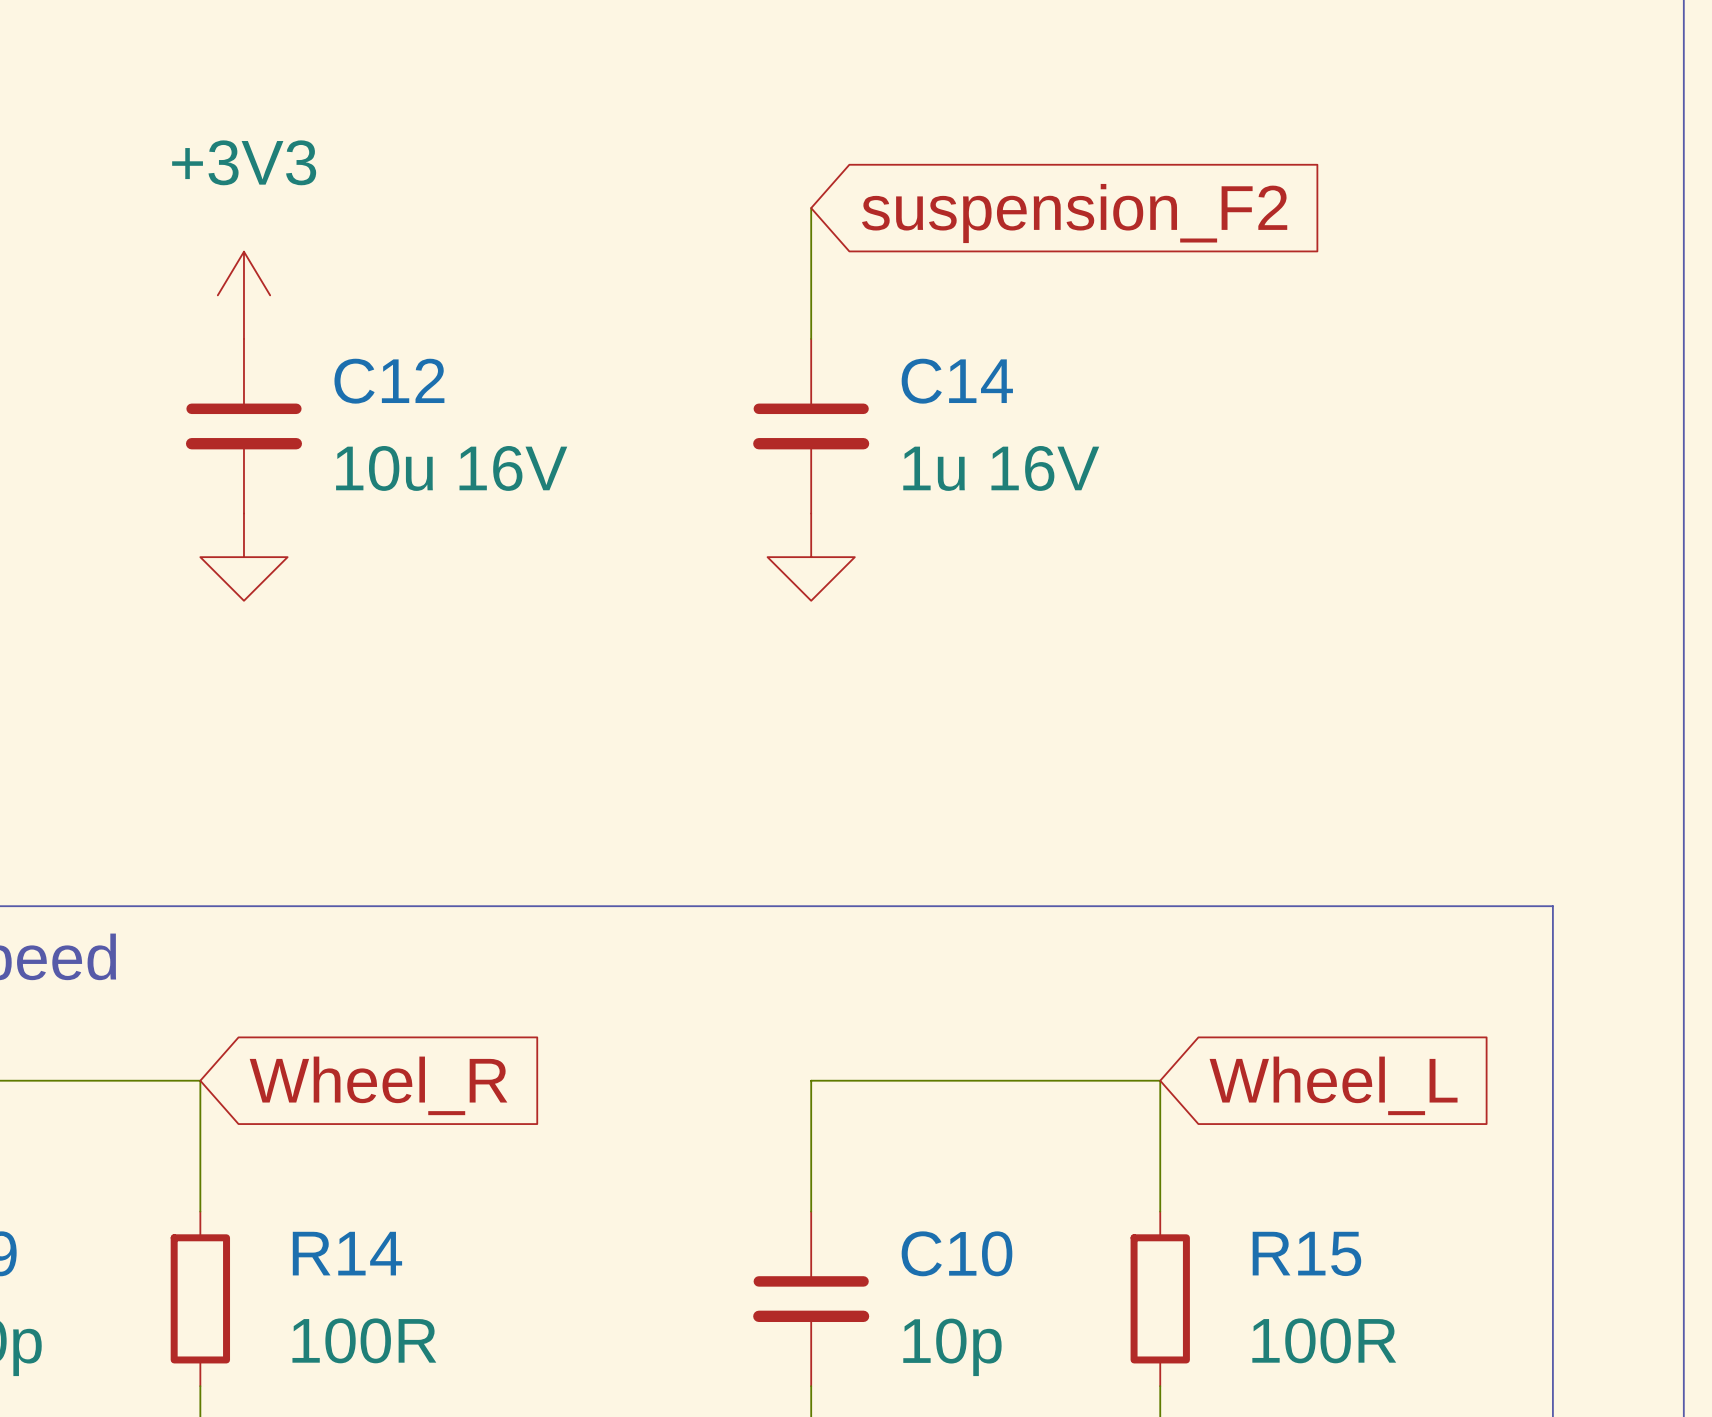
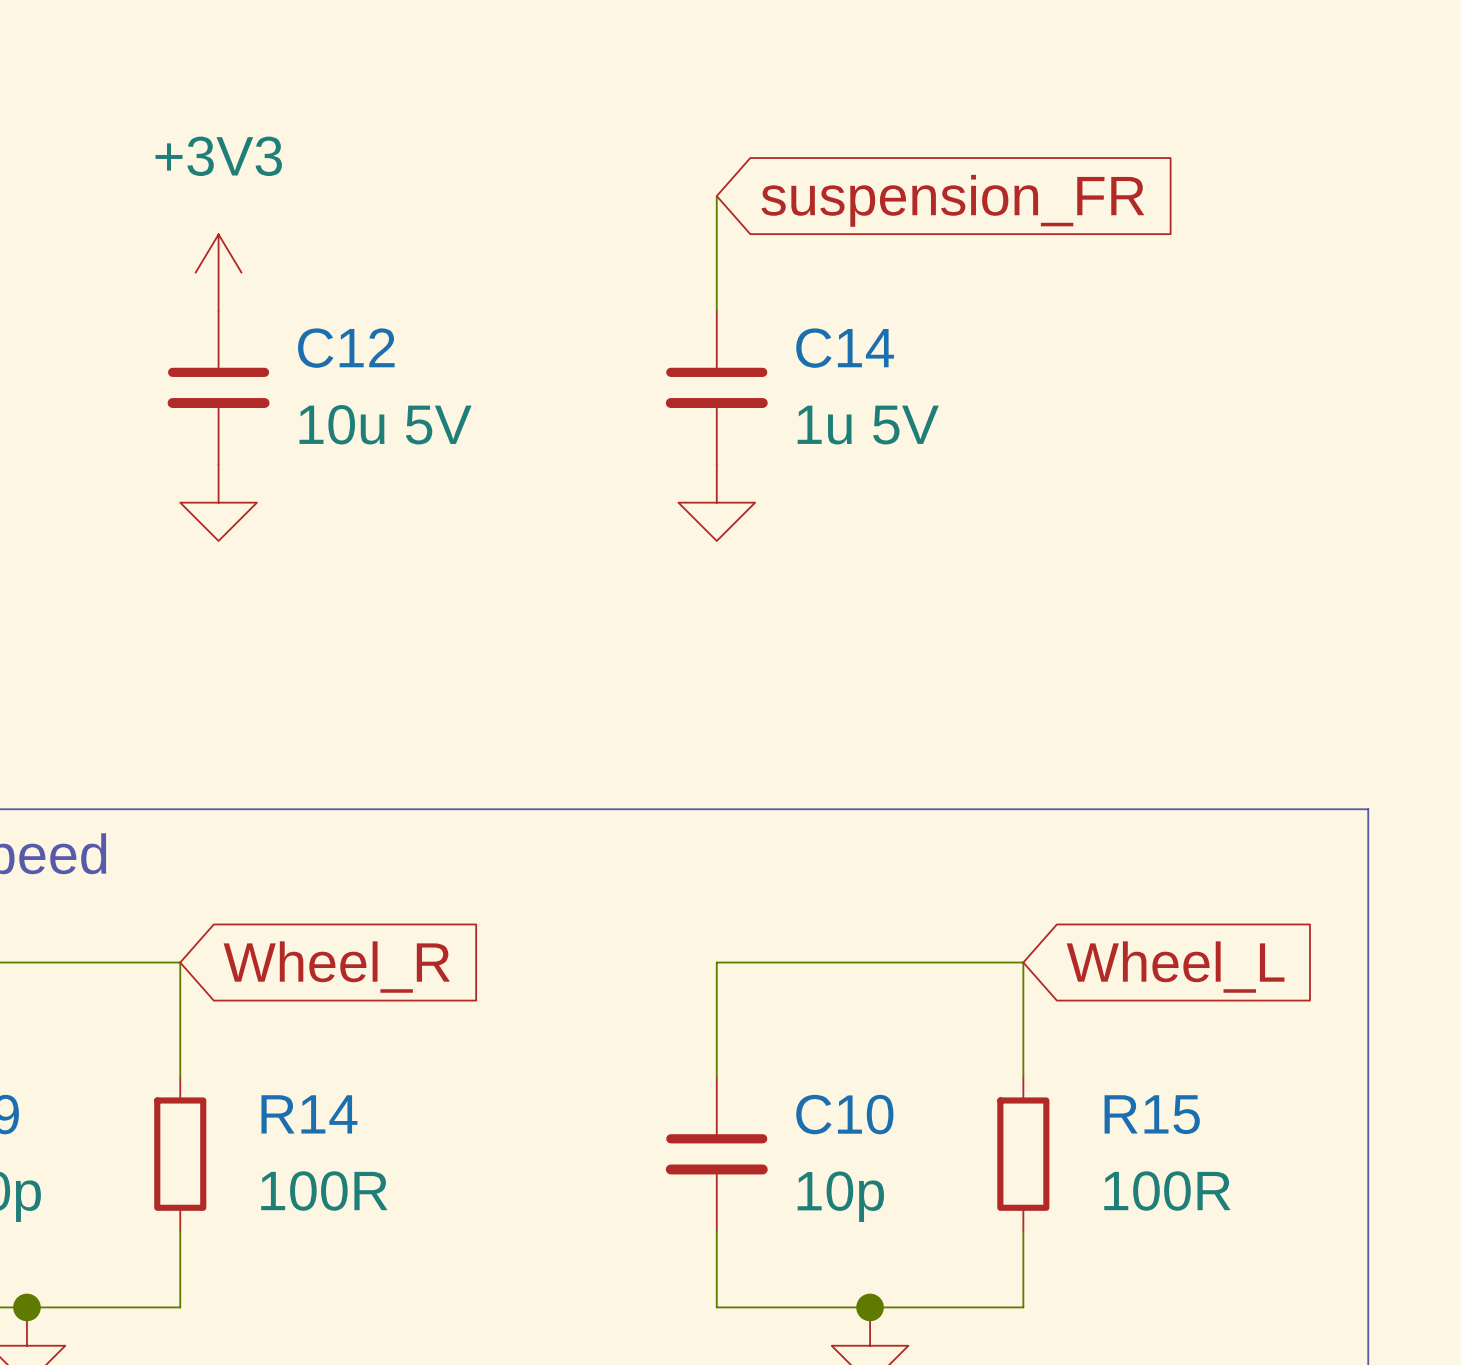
global label: suspension_F2 (1074, 213) -> suspension_FR (952, 200)
C12 value: 10u 16V (451, 468) -> 10u 5V (385, 424)
C14 value: 1u 16V (1001, 468) -> 1u 5V (868, 425)

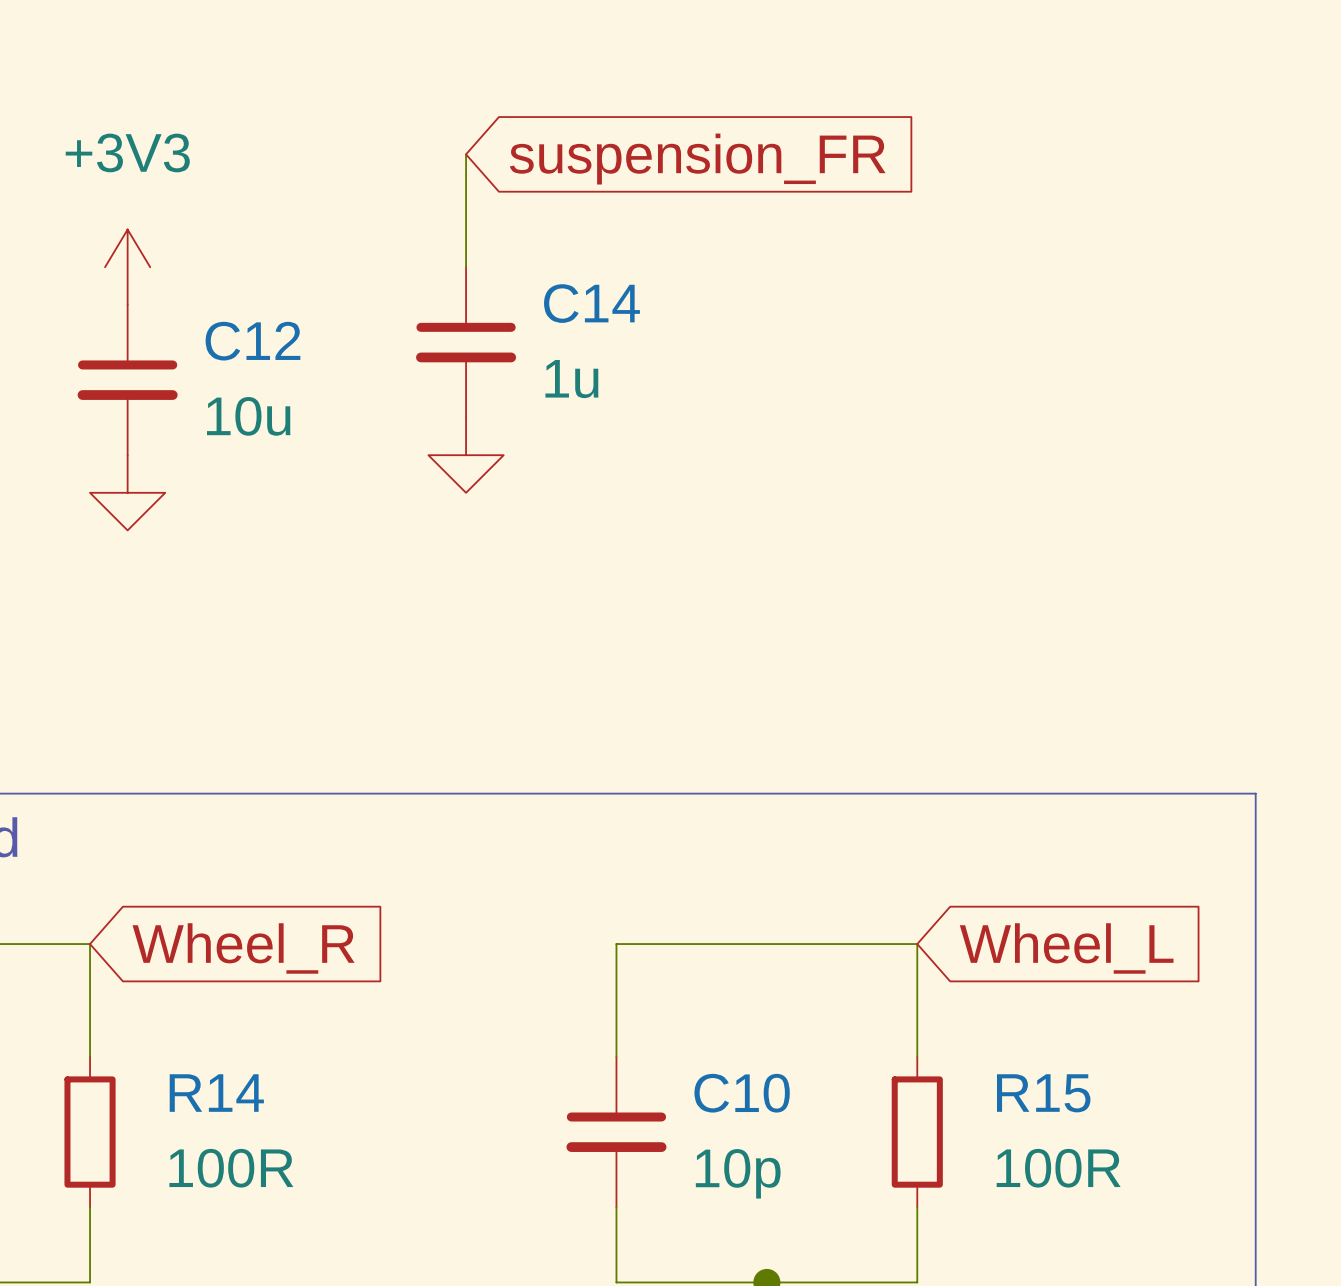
wire: (716, 196) (716, 311) -> (466, 154) (466, 267)
global label position: suspension_FR (952, 200) -> suspension_FR (697, 159)
C14 position: (716, 387) -> (466, 342)
C12 value: 10u 5V (385, 424) -> 10u (248, 416)
C14 value: 1u 5V (868, 425) -> 1u (571, 379)
power symbol position: (716, 502) -> (466, 455)

